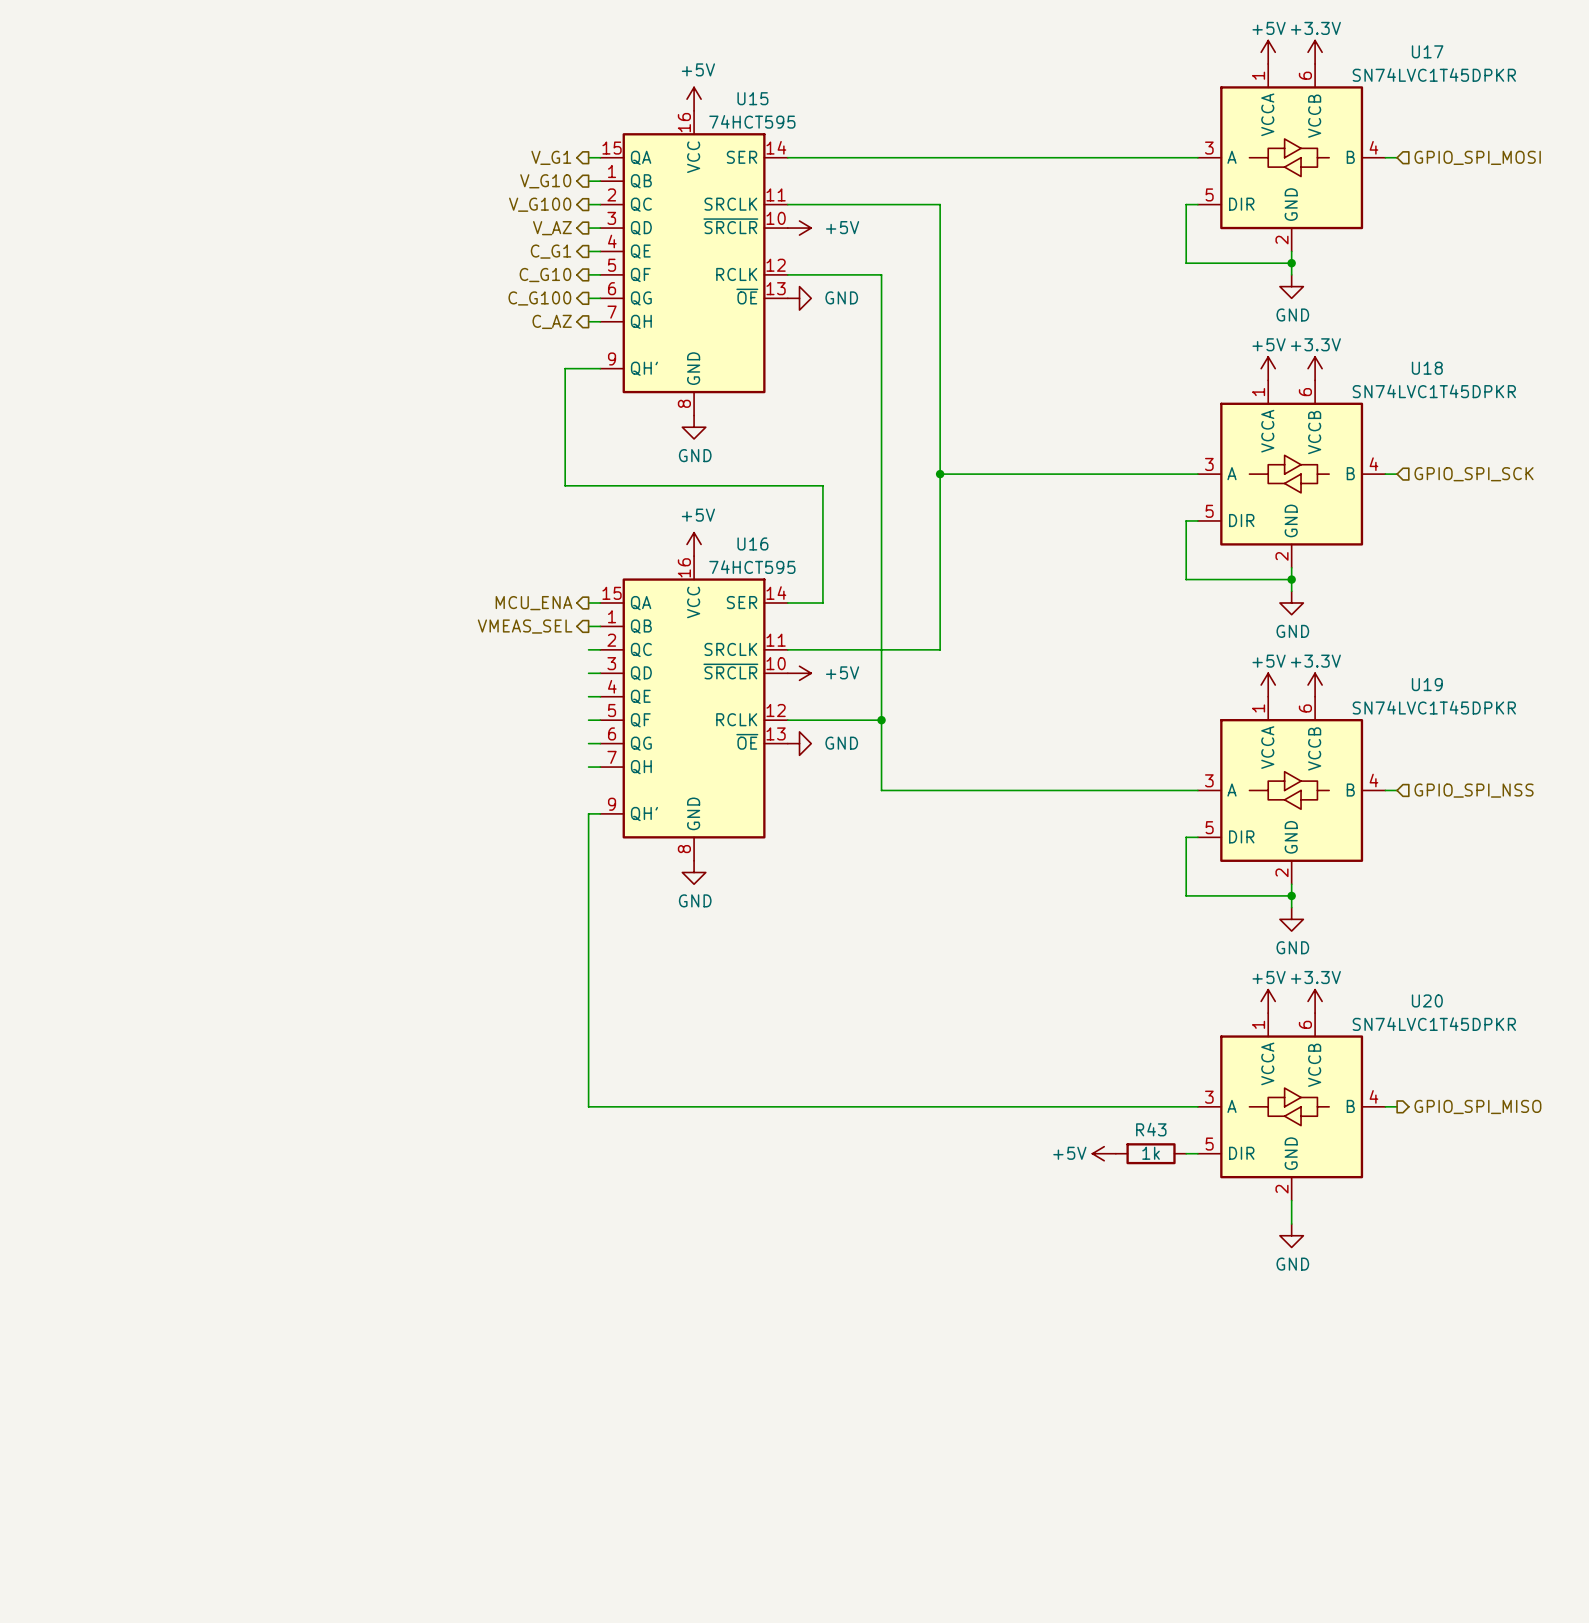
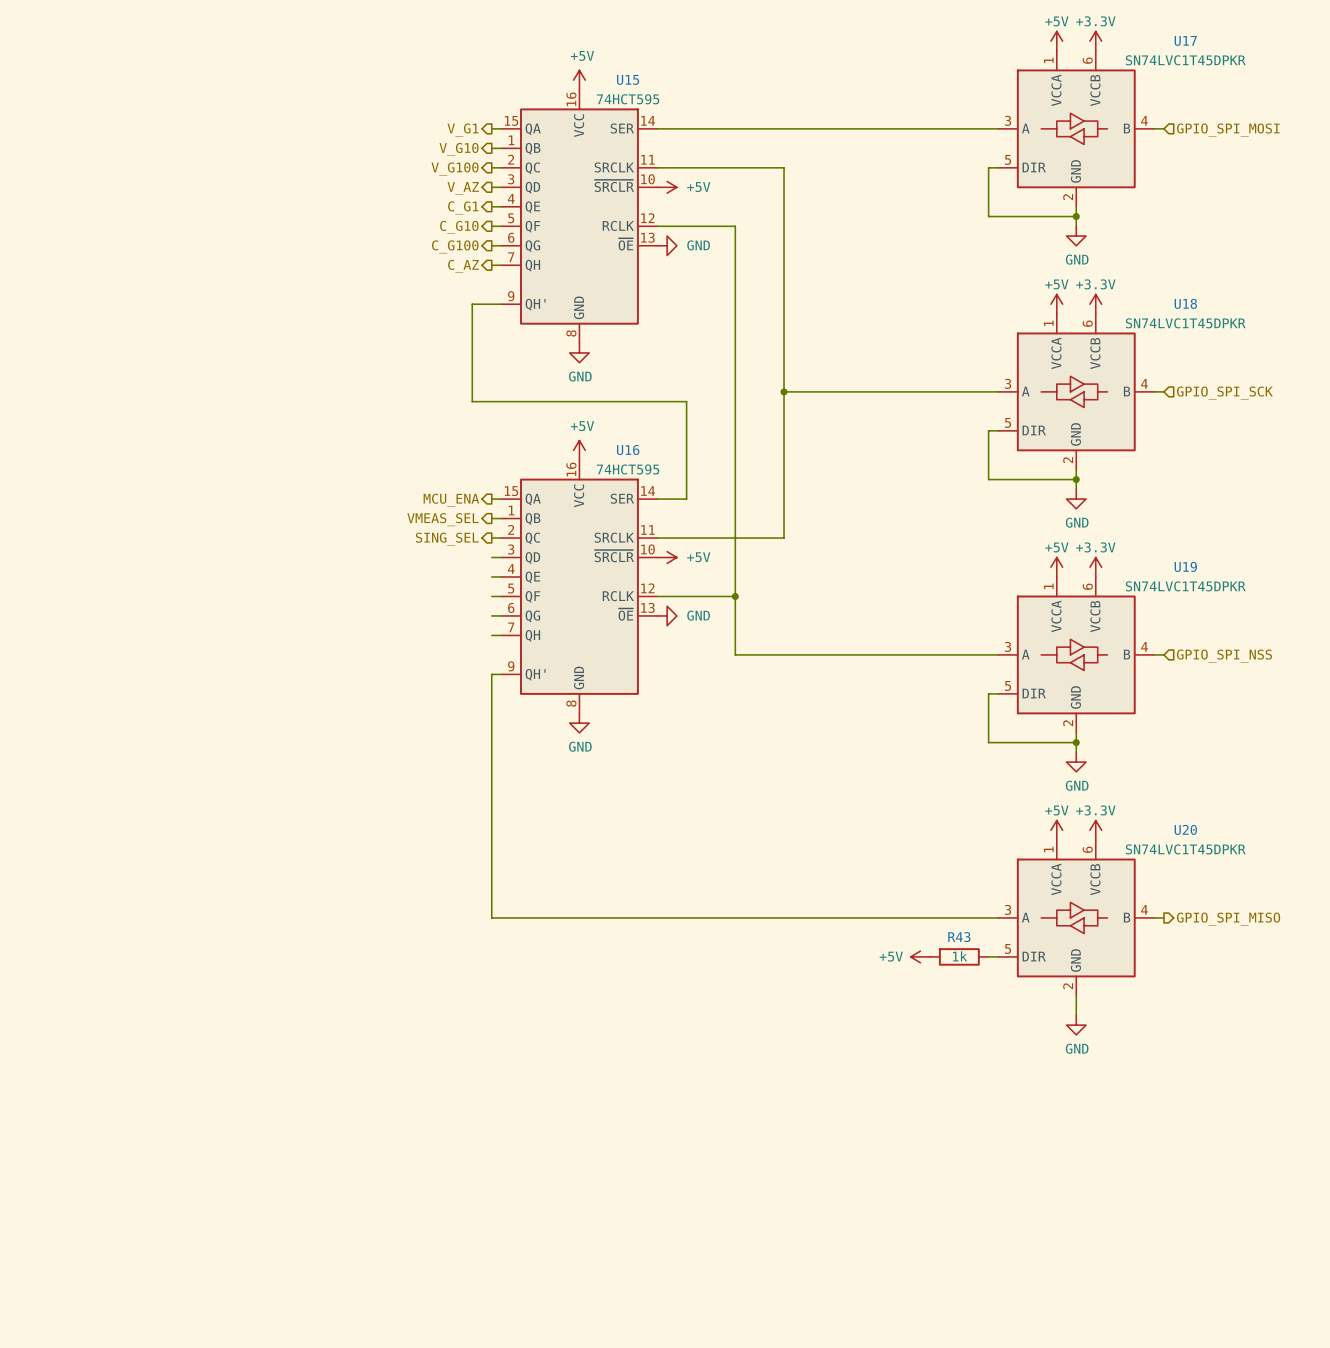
hierarchical label: none -> SING_SEL (447, 539)

